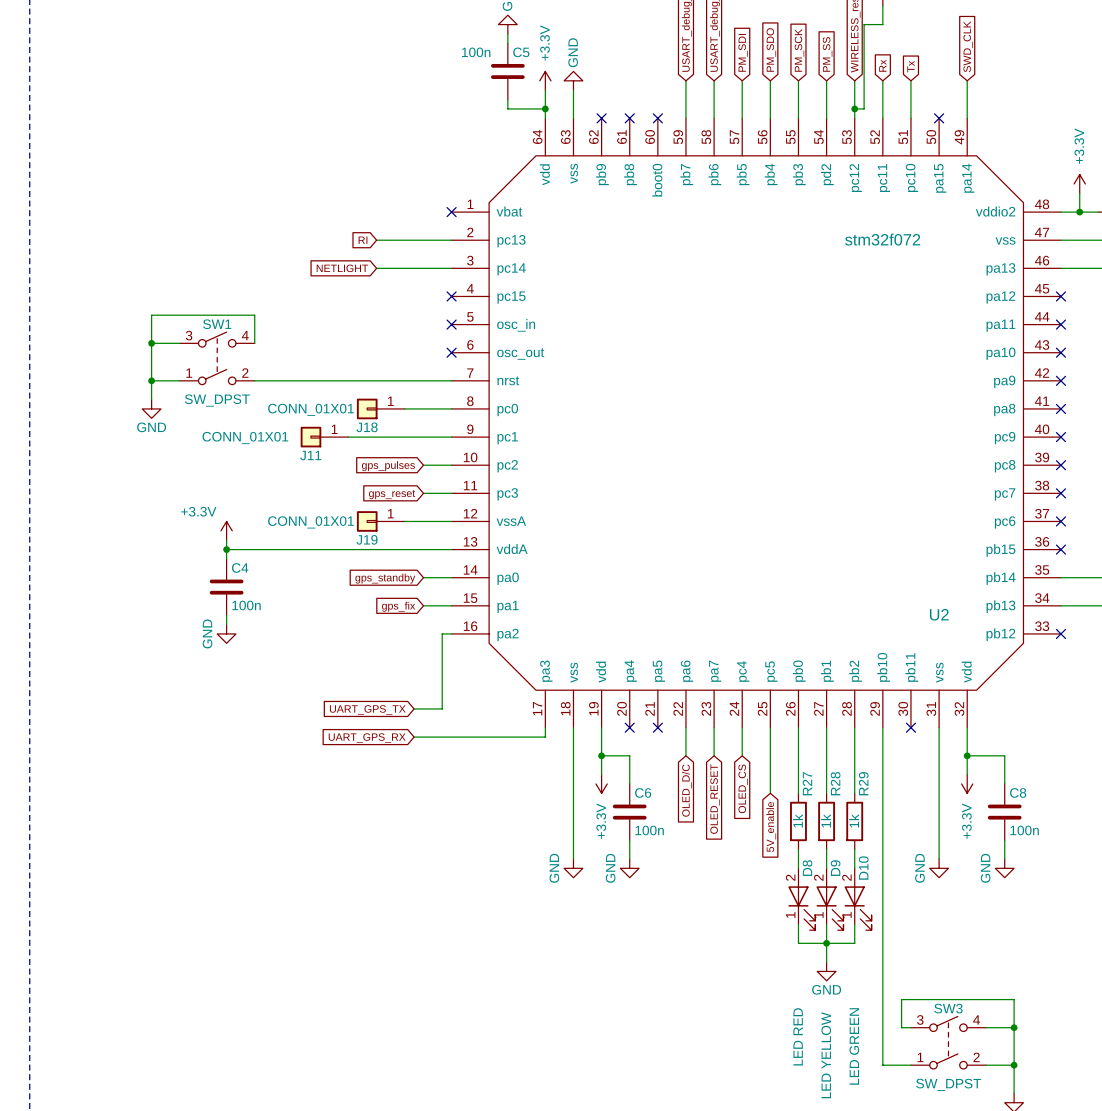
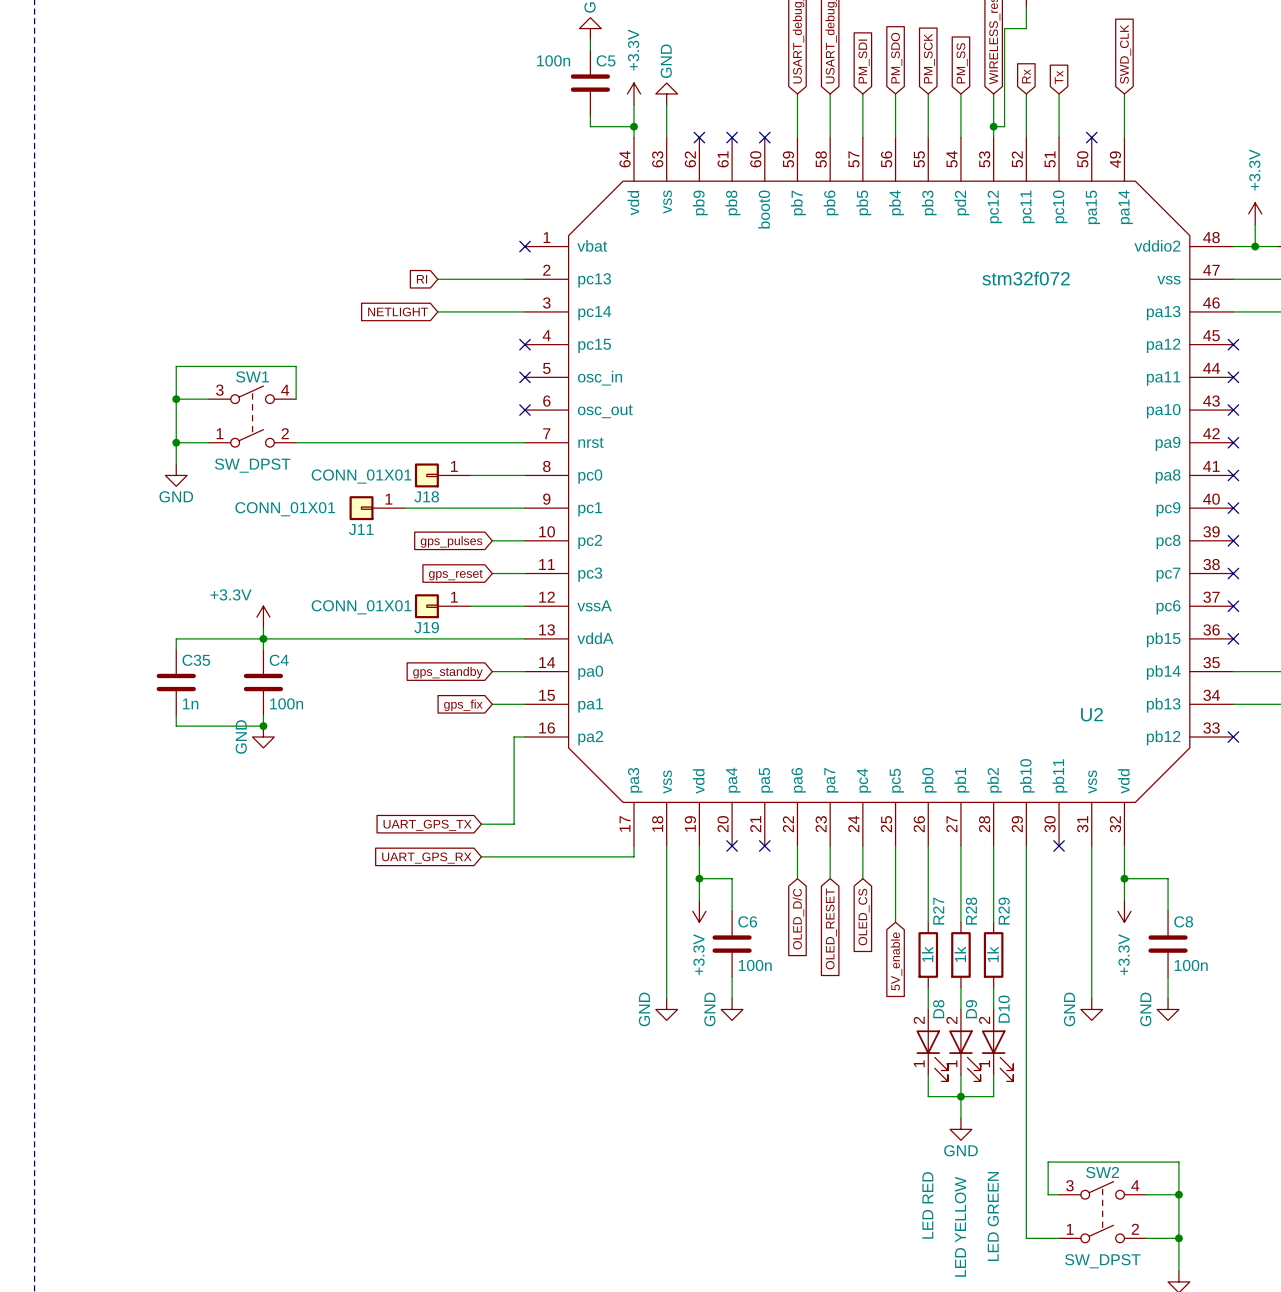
wire: none -> (263, 638) (176, 638) (176, 649)
C35: none -> 1n (176, 682)
wire: none -> (176, 715) (176, 726) (263, 726)
junction: none -> (263, 726)
SW3 name: SW3 (948, 1008) -> SW2 (1102, 1172)

